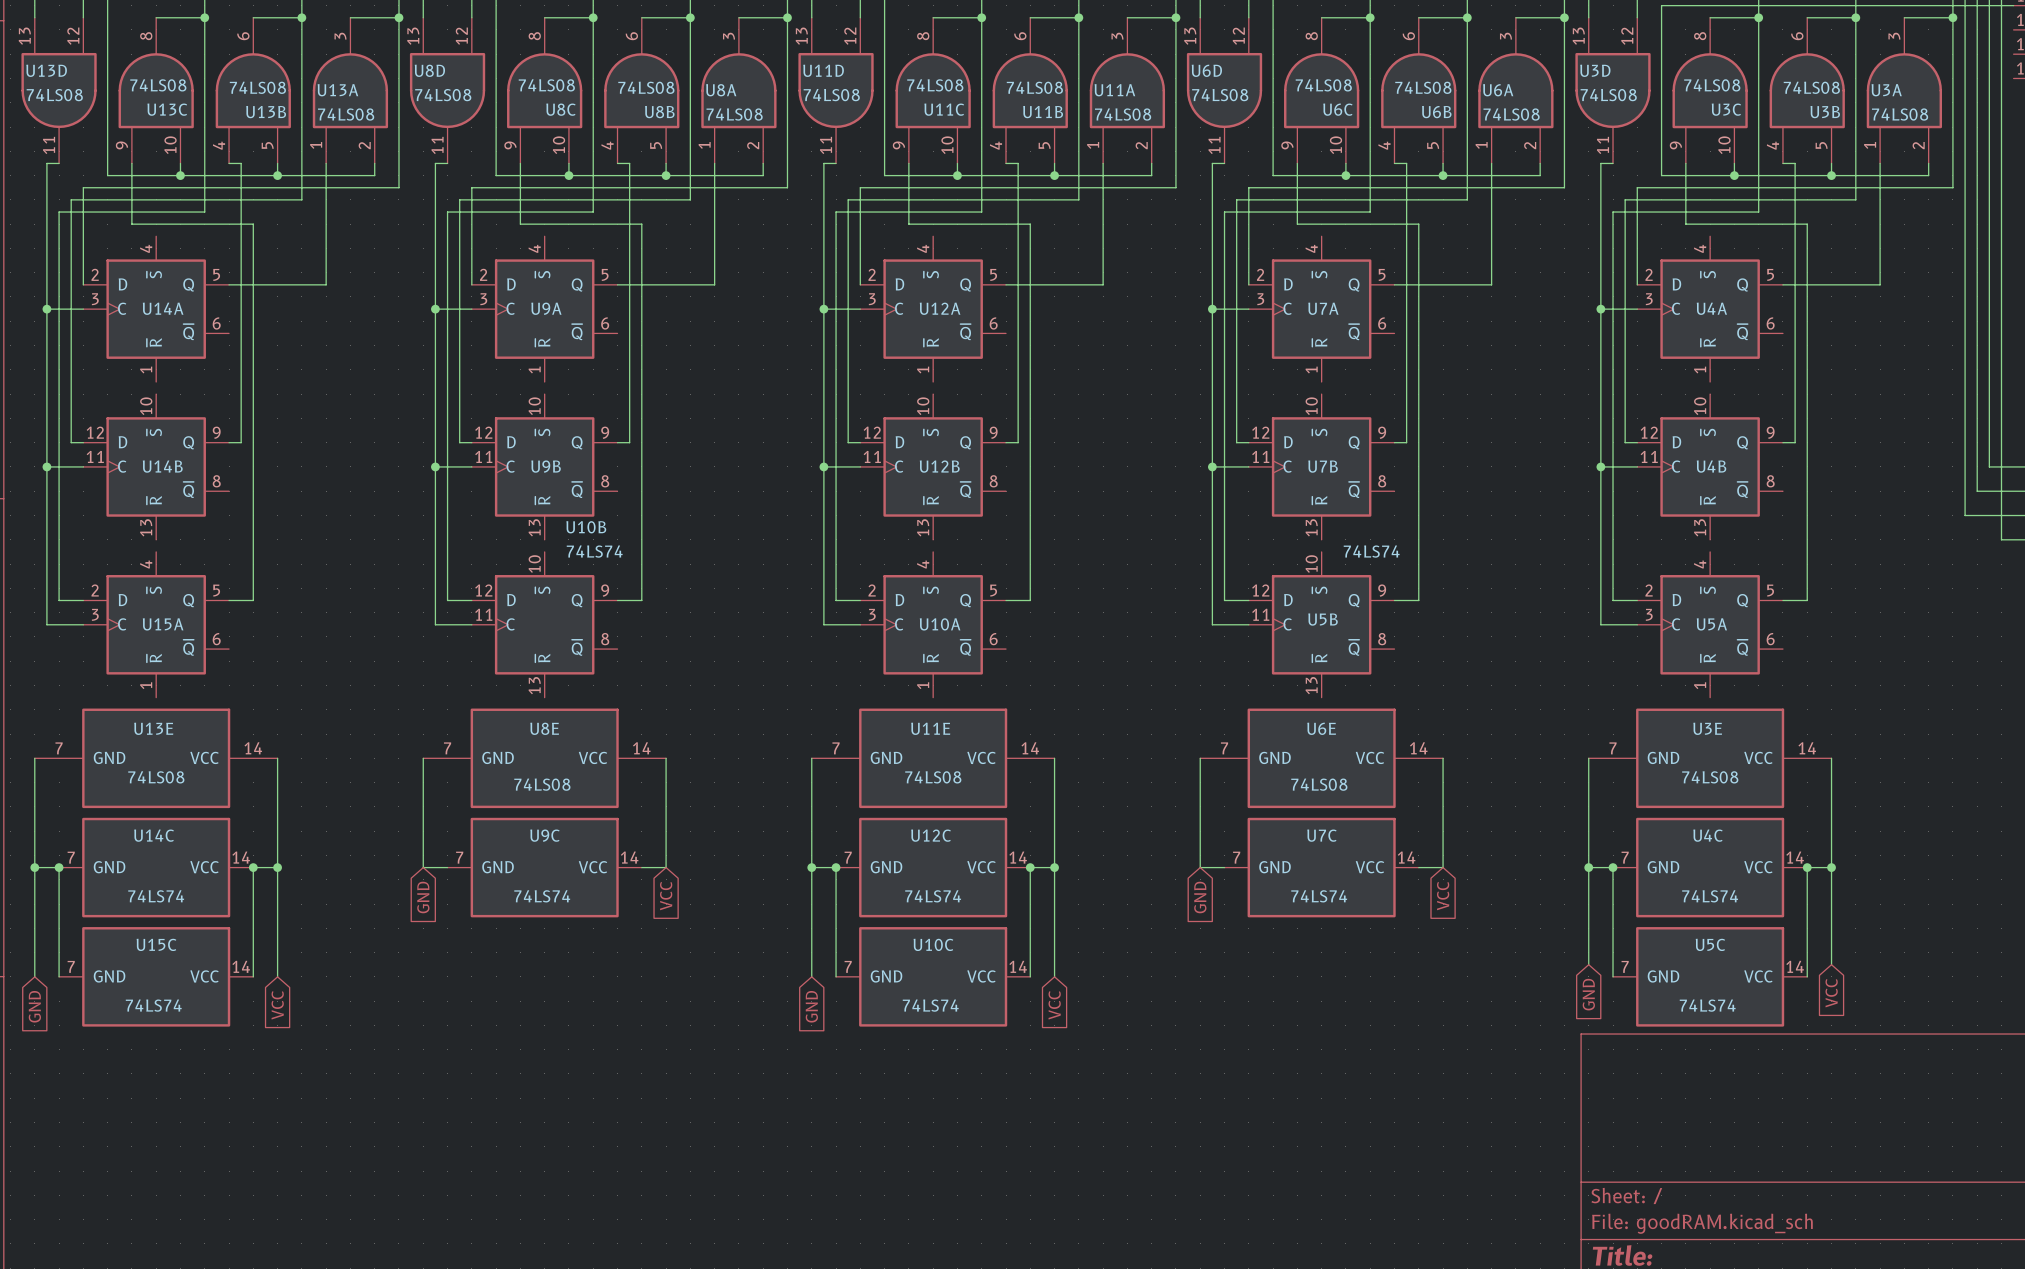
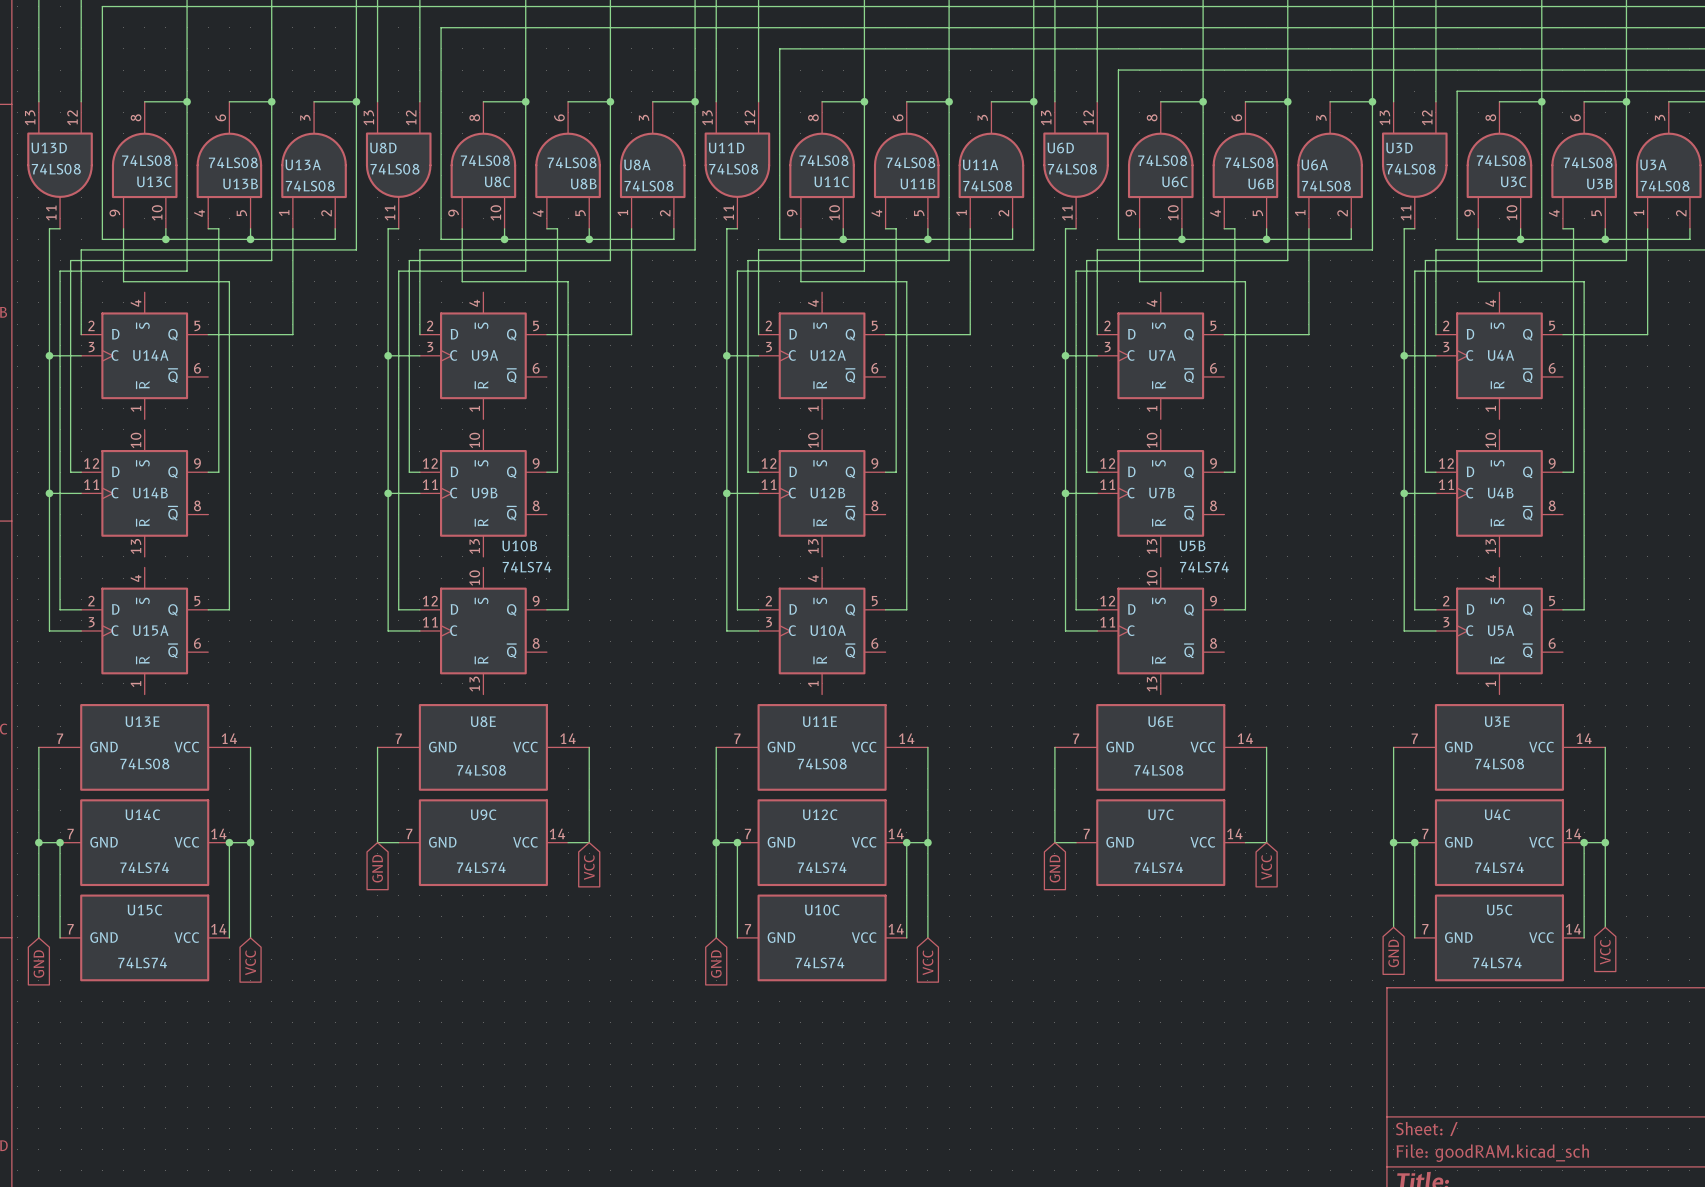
U5B name position: U5B (1323, 619) -> U5B (1192, 545)

